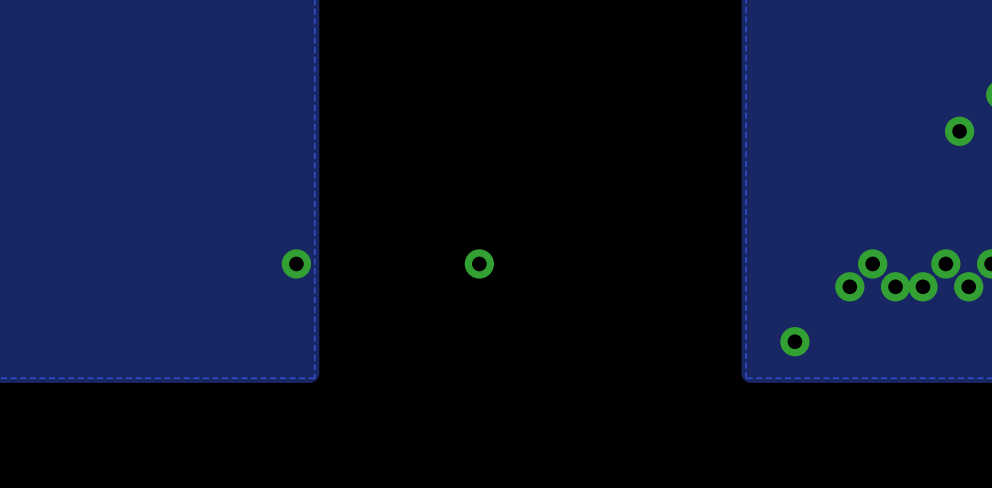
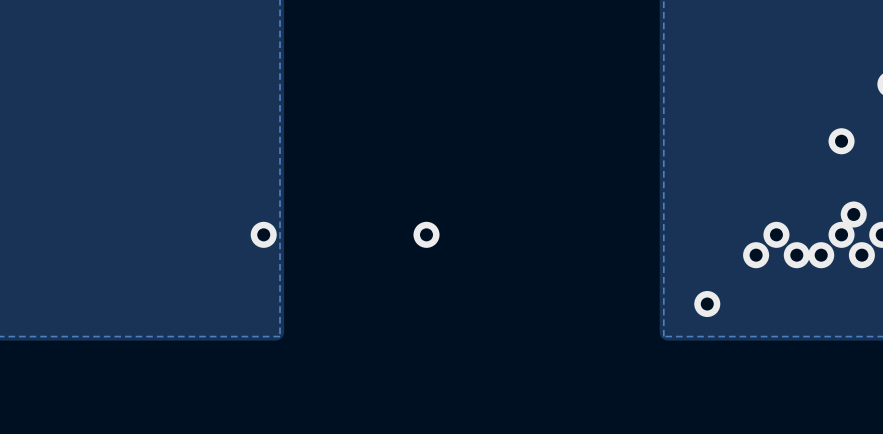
via position: (959, 131) -> (841, 141)
via: none -> (853, 214)

